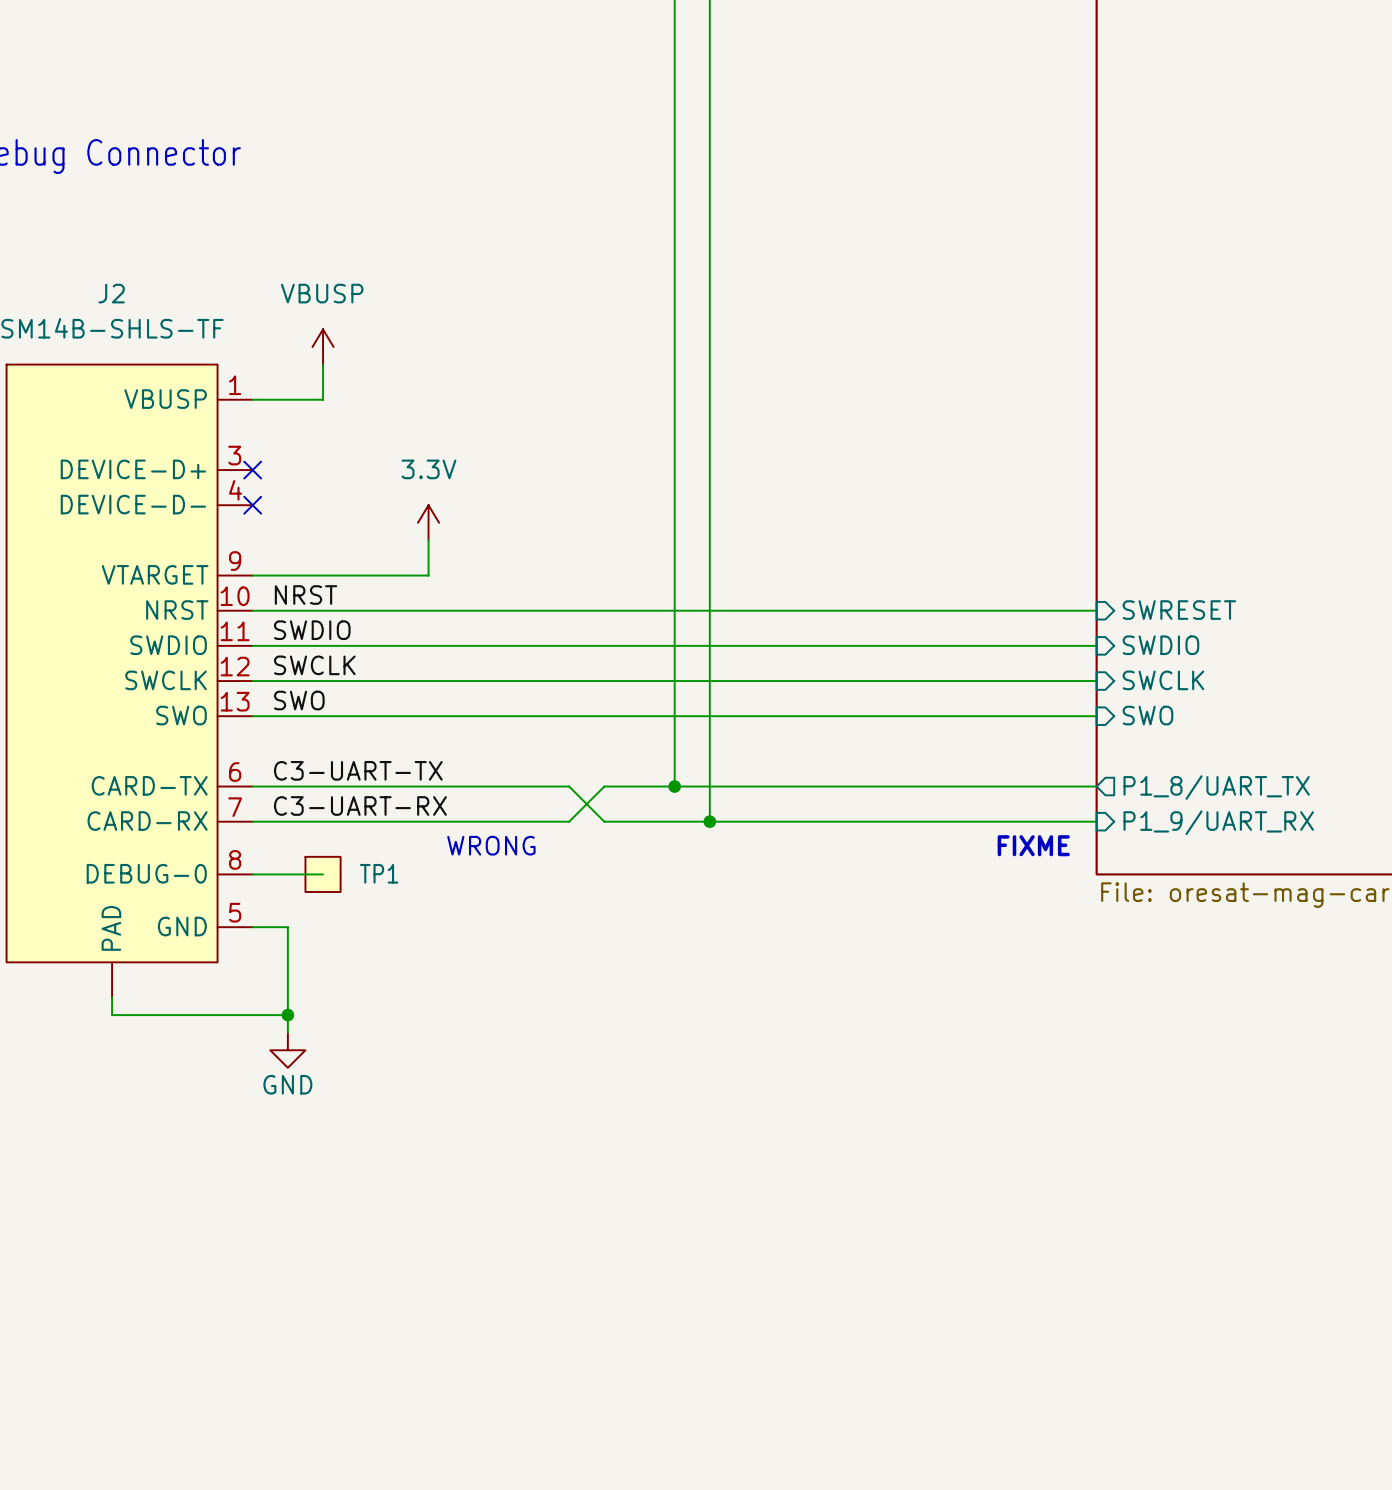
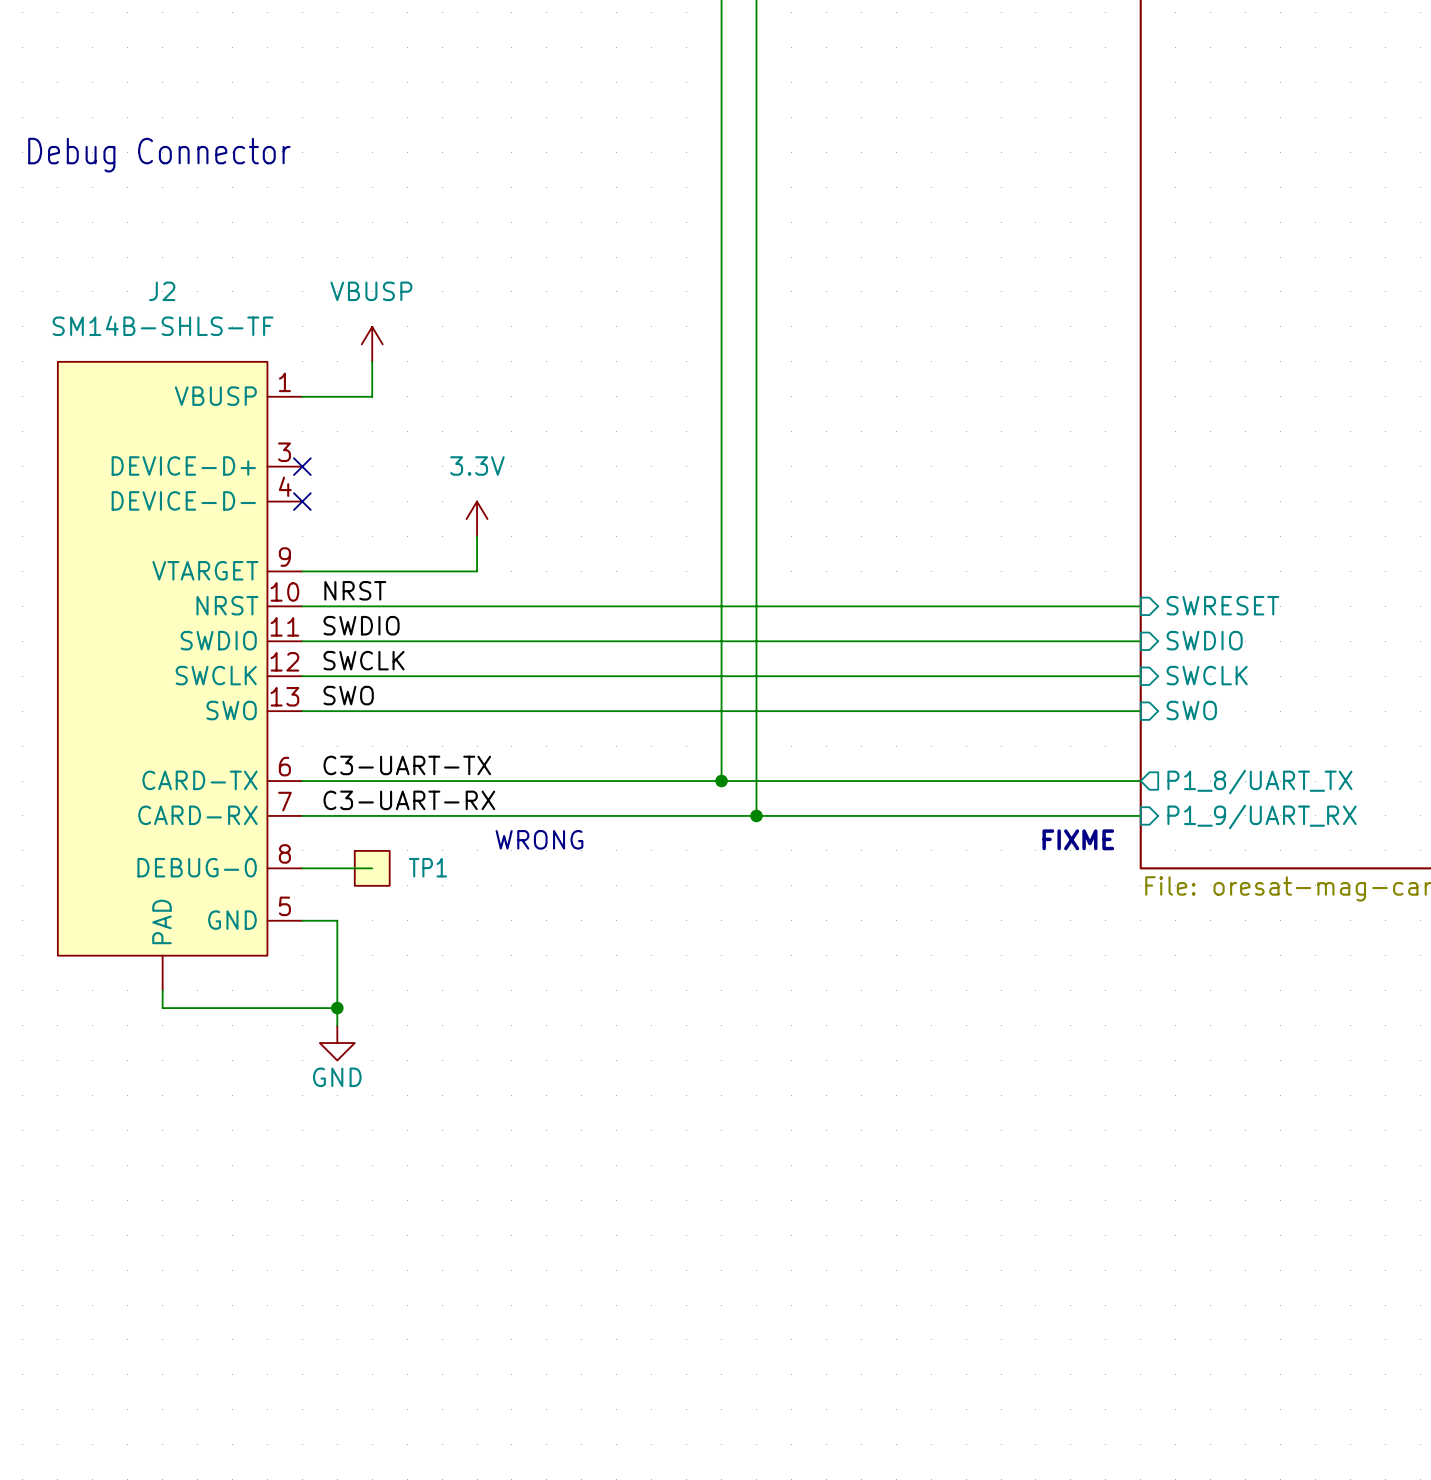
wire: (569, 786) (604, 821) -> (616, 781) (651, 781)
wire: (604, 786) (569, 821) -> (651, 815) (616, 815)

